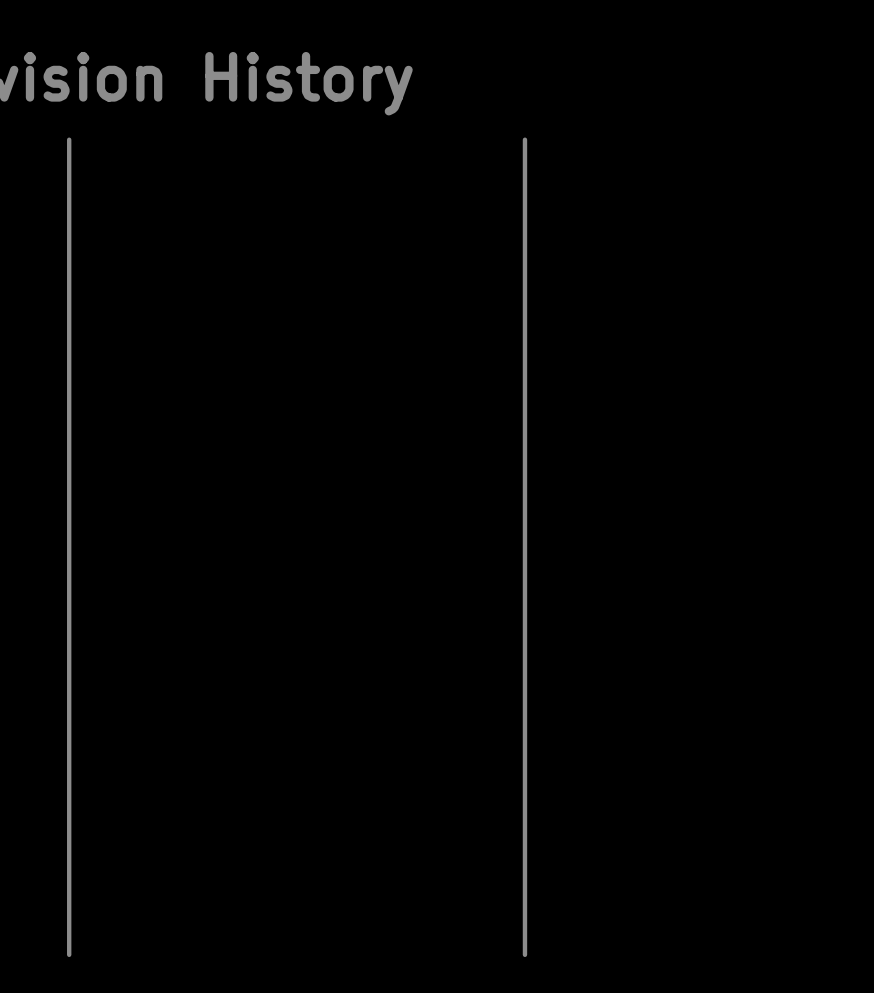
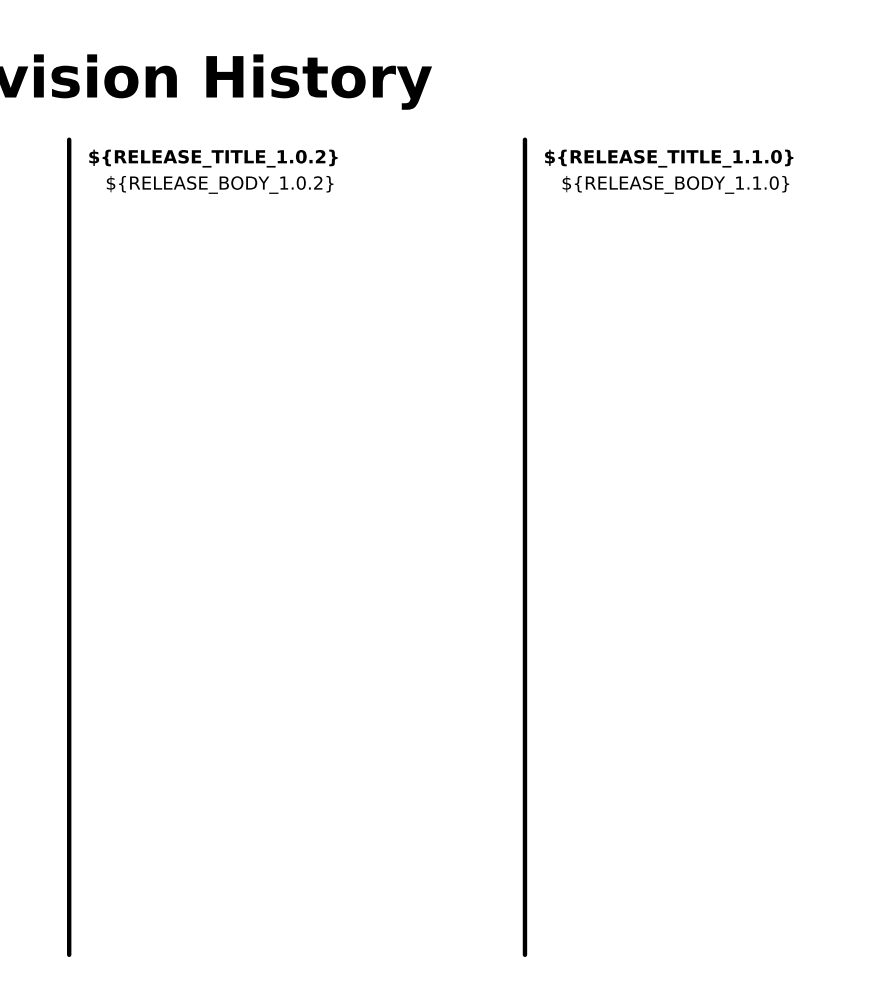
text: none -> ${RELEASE_TITLE_1.0.2} (213, 158)
text: none -> ${RELEASE_TITLE_1.1.0} (669, 158)
text: none -> ${RELEASE_BODY_1.0.2} (220, 184)
text: none -> ${RELEASE_BODY_1.1.0} (675, 184)

